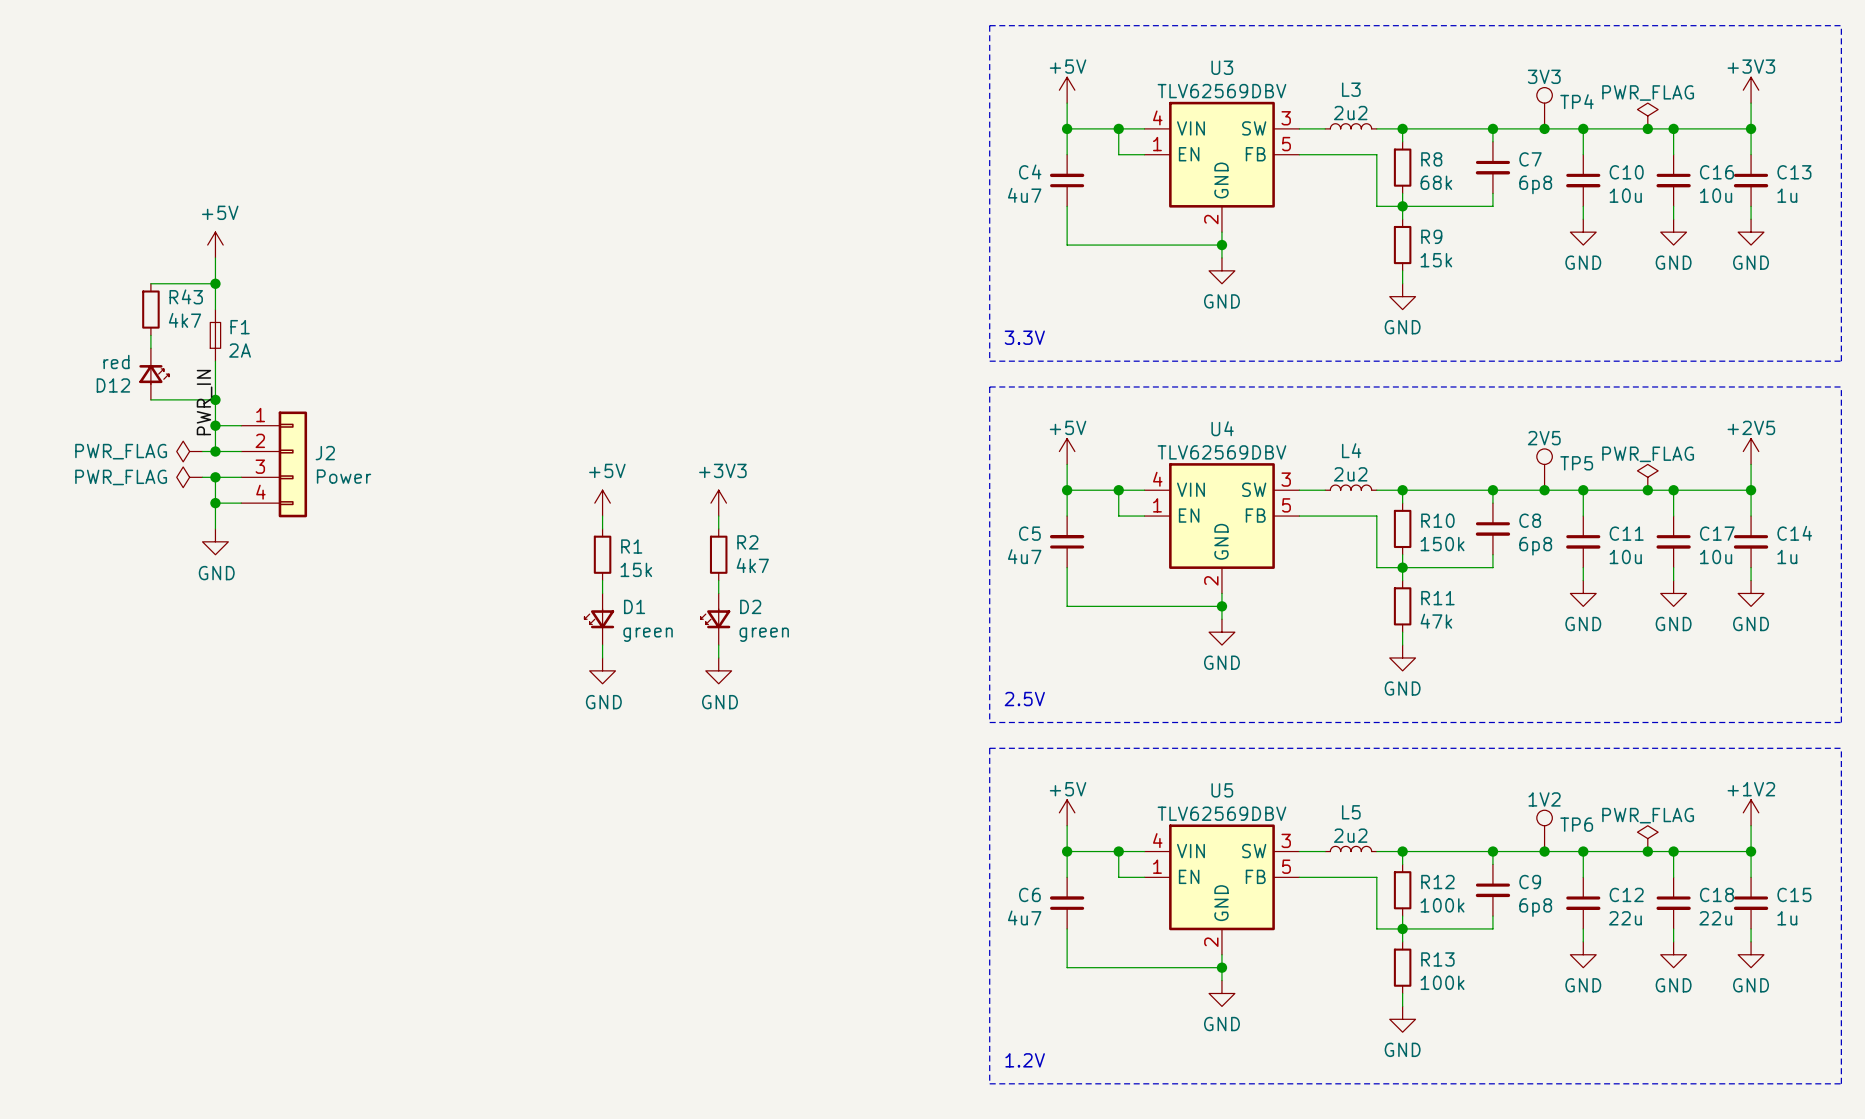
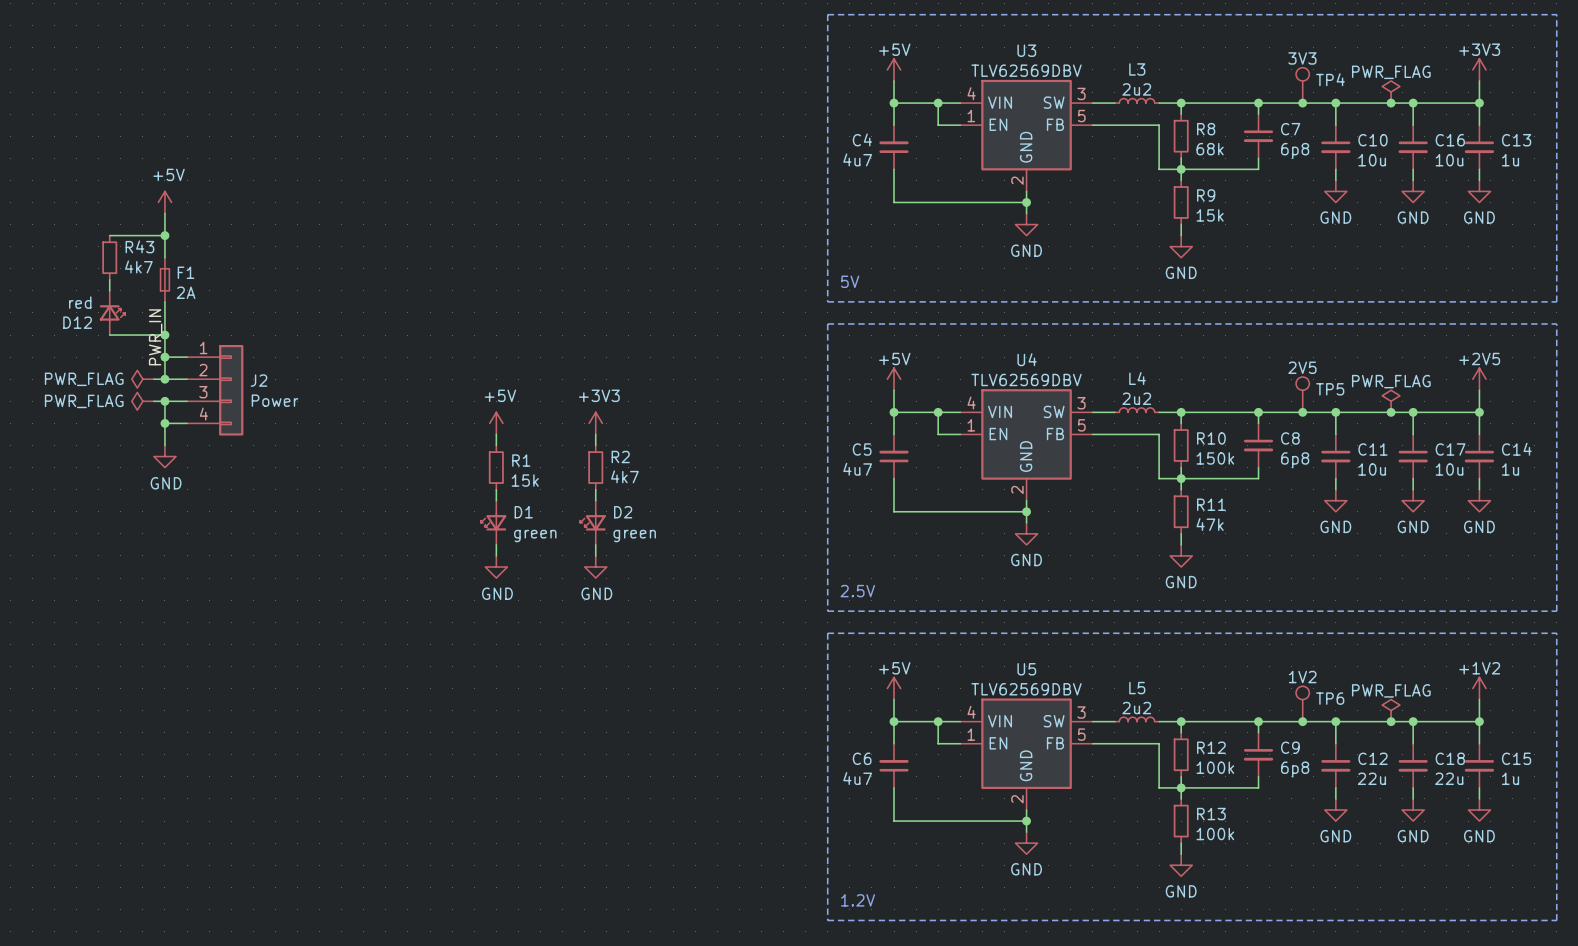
text: 3.3V (1024, 337) -> 5V (850, 281)

